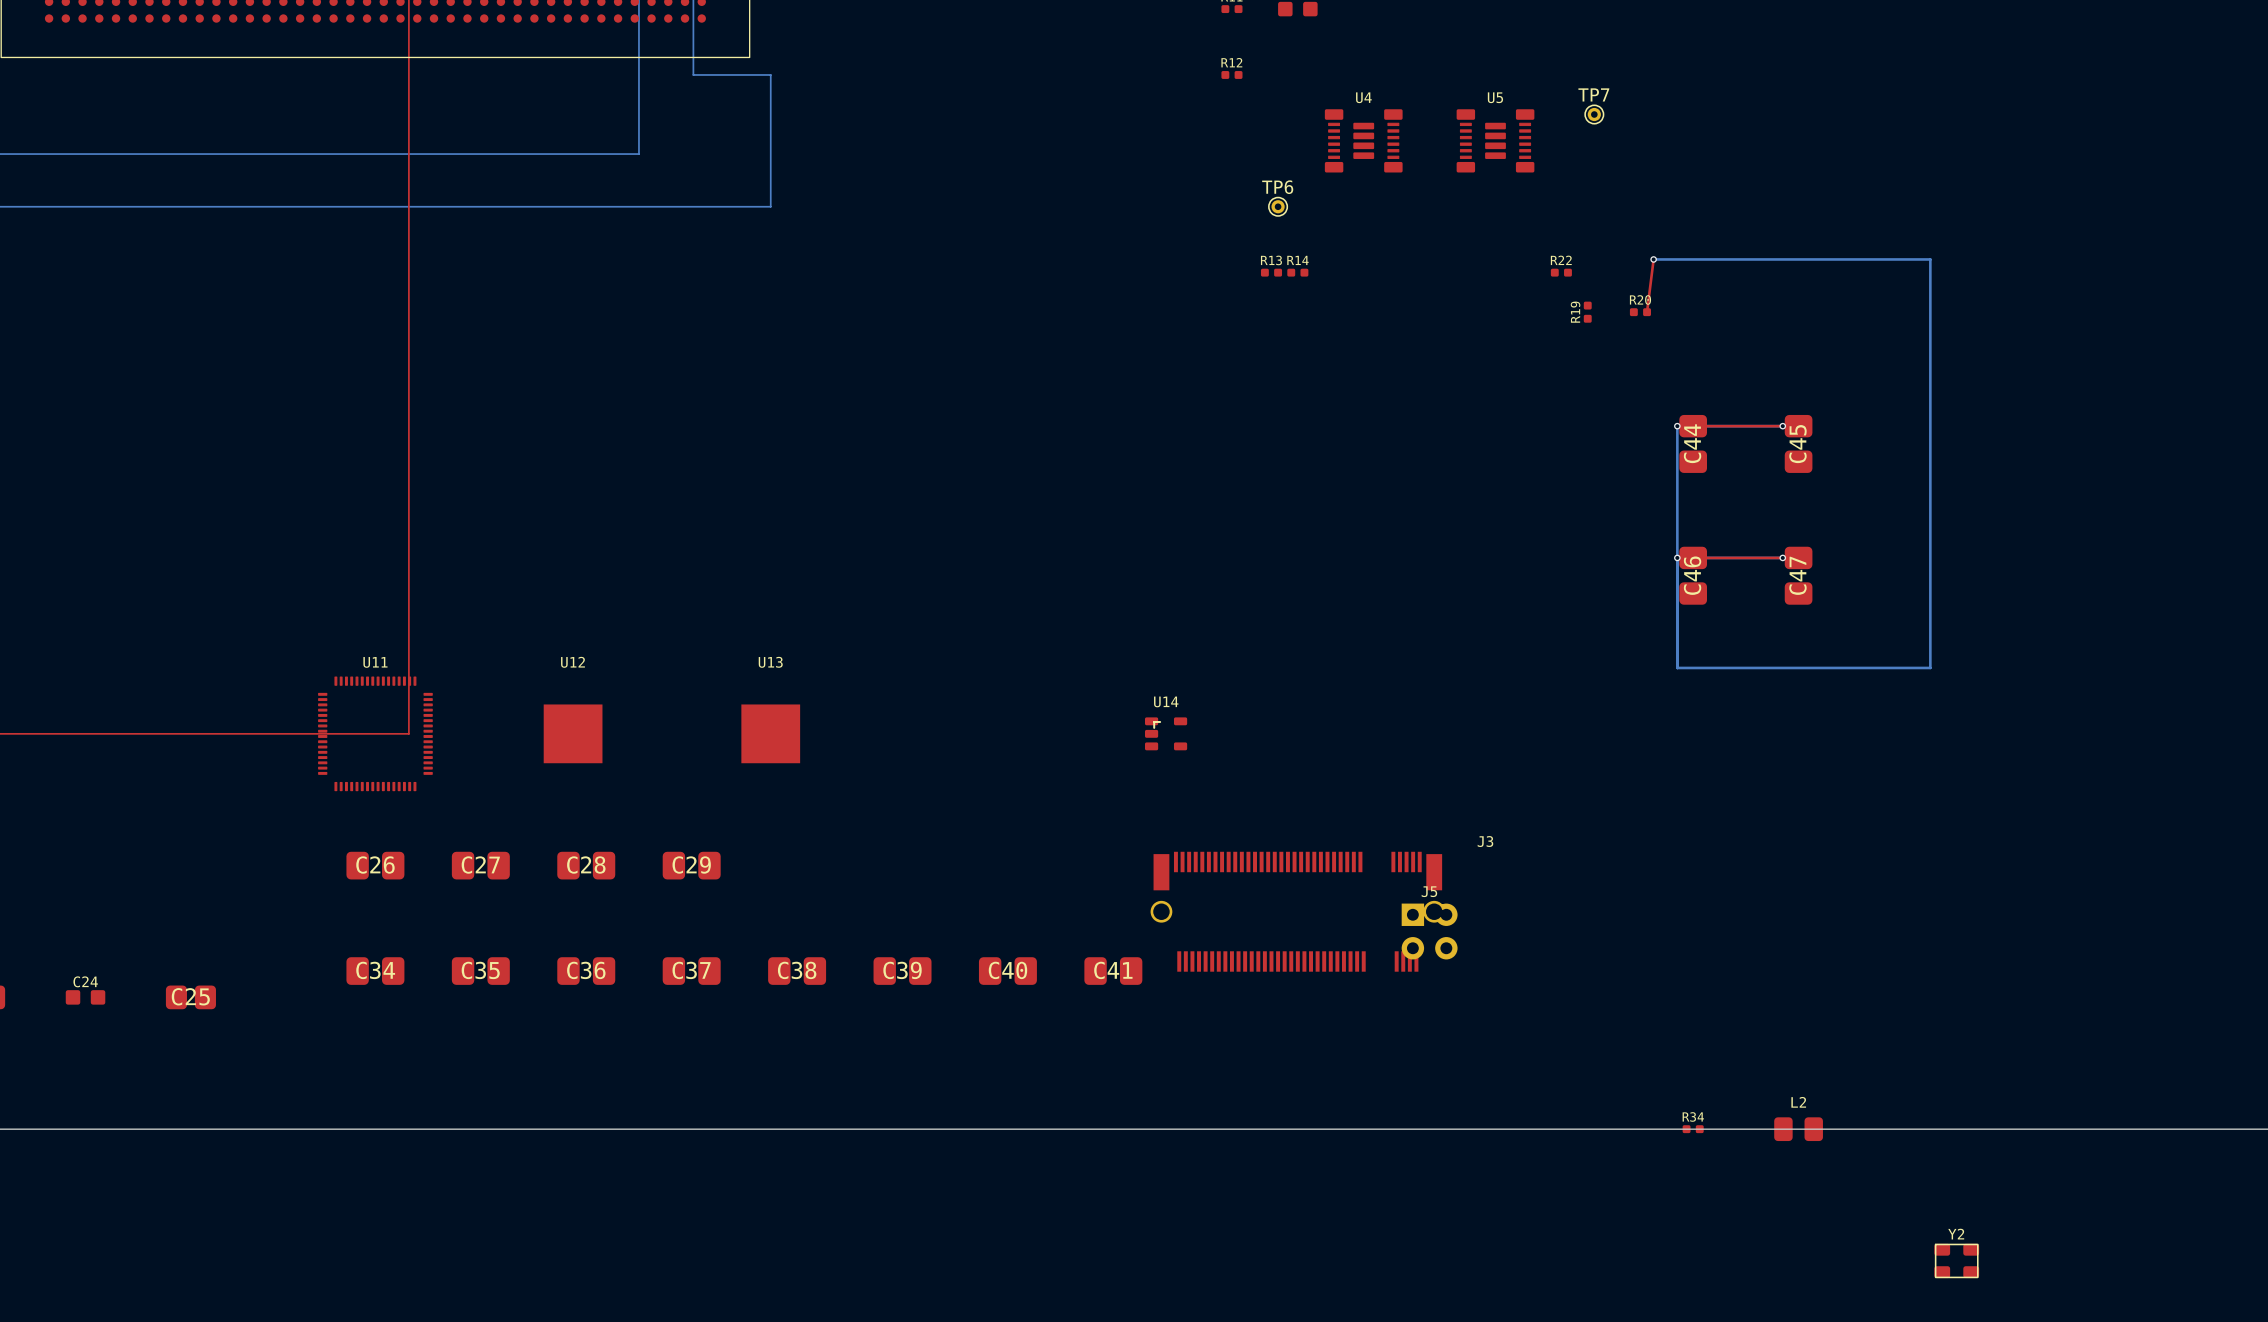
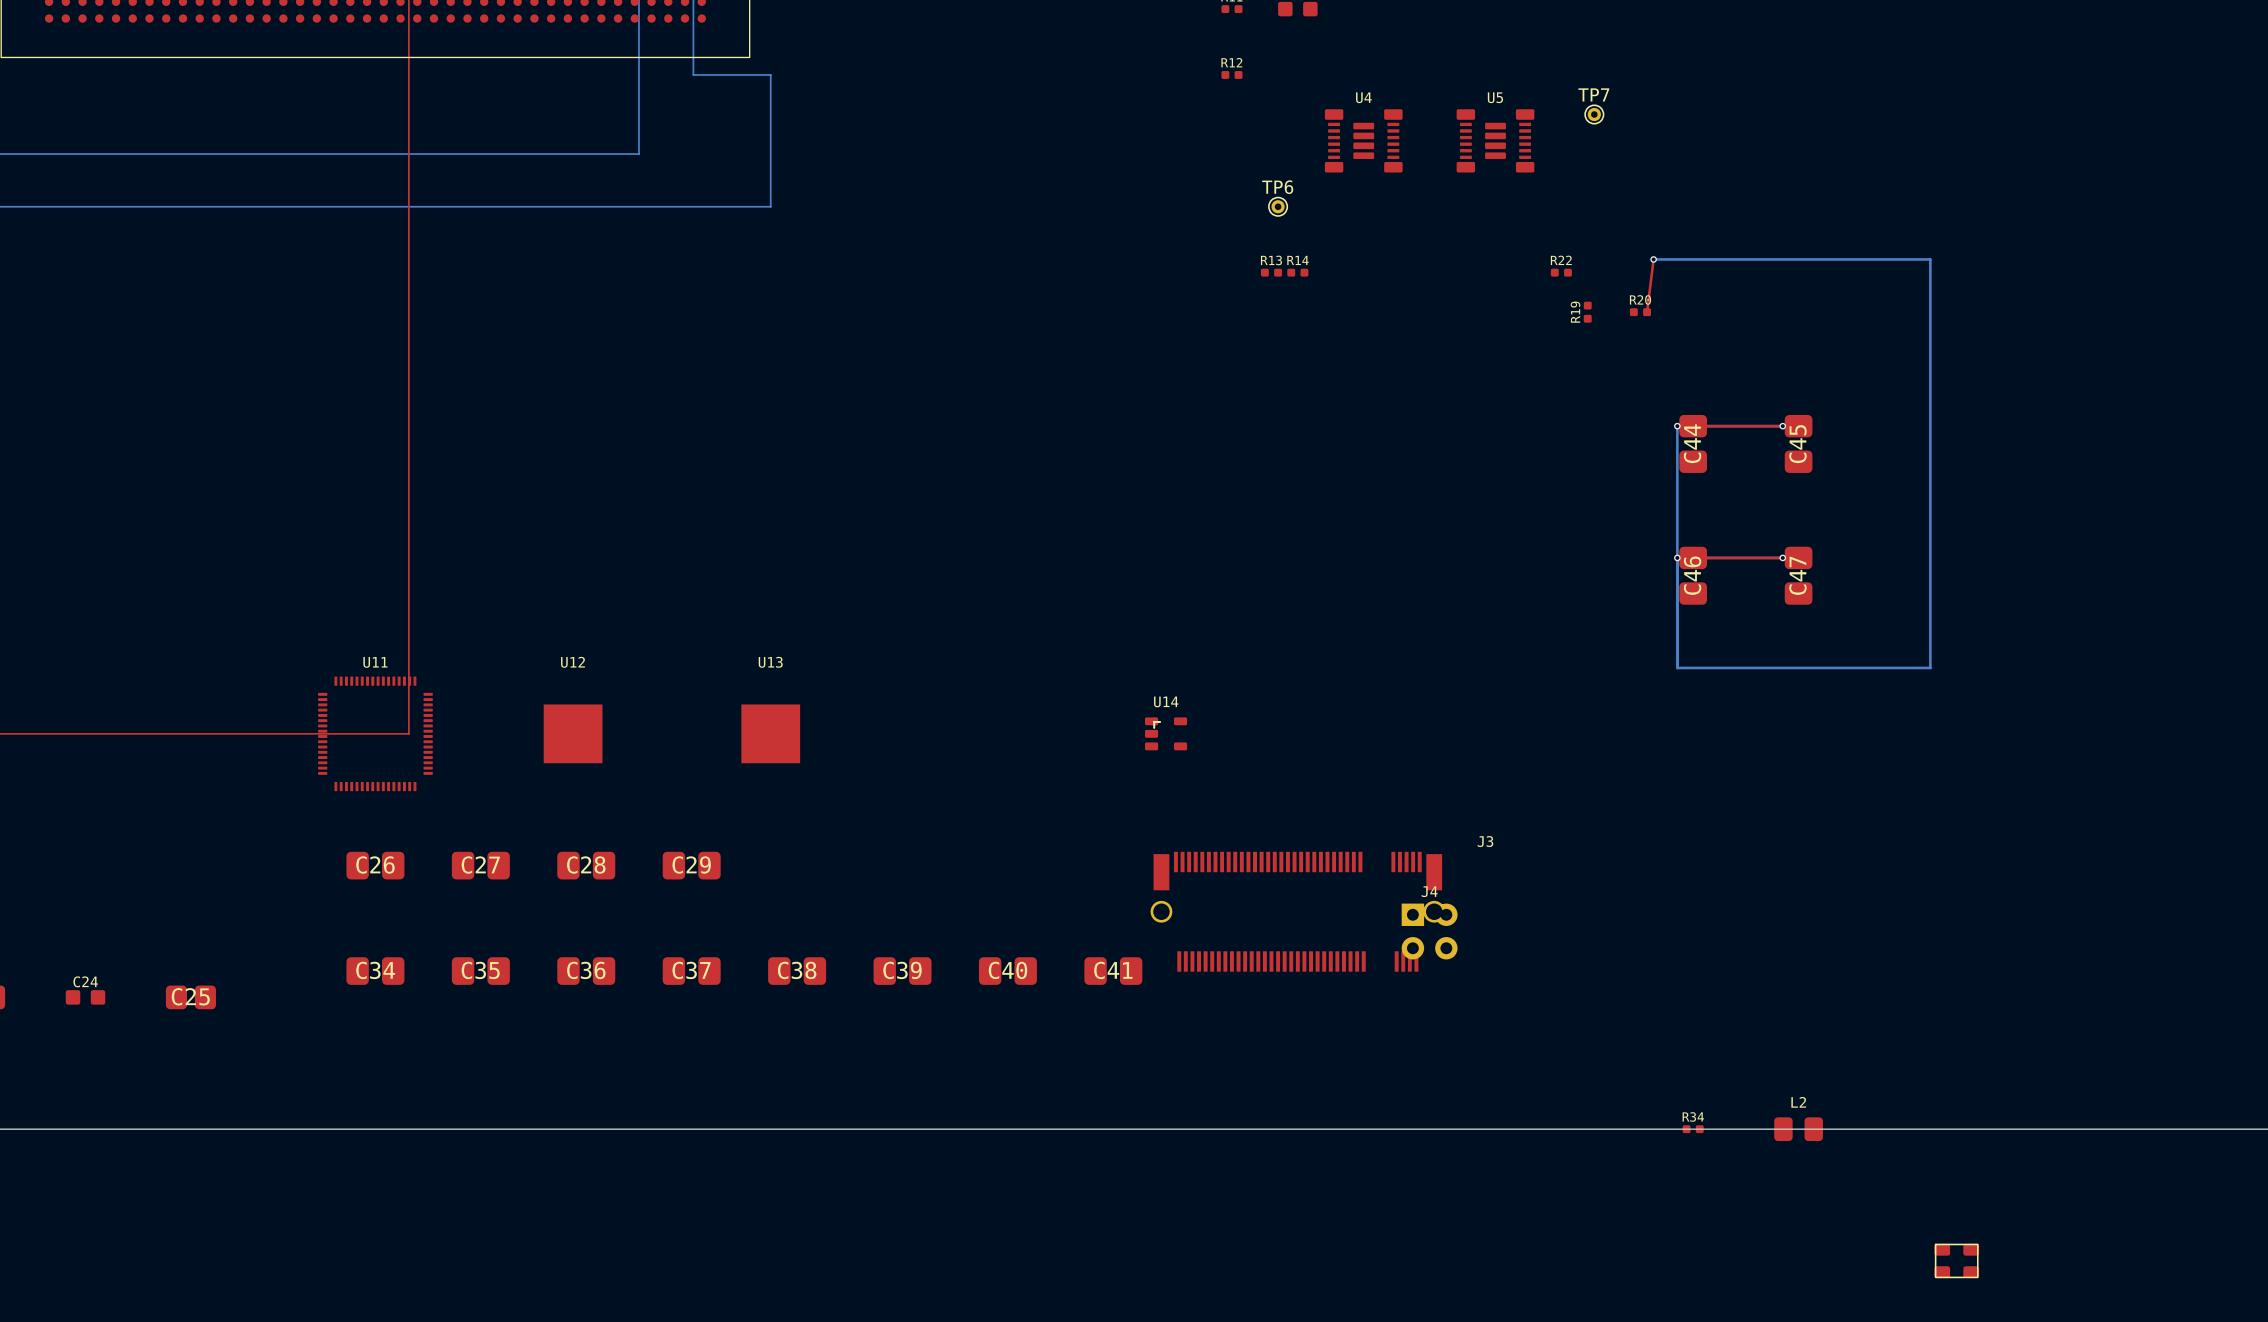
J5 name: J5 (1429, 891) -> J4 (1429, 891)
Y2 name: Y2 (1956, 1234) -> none

